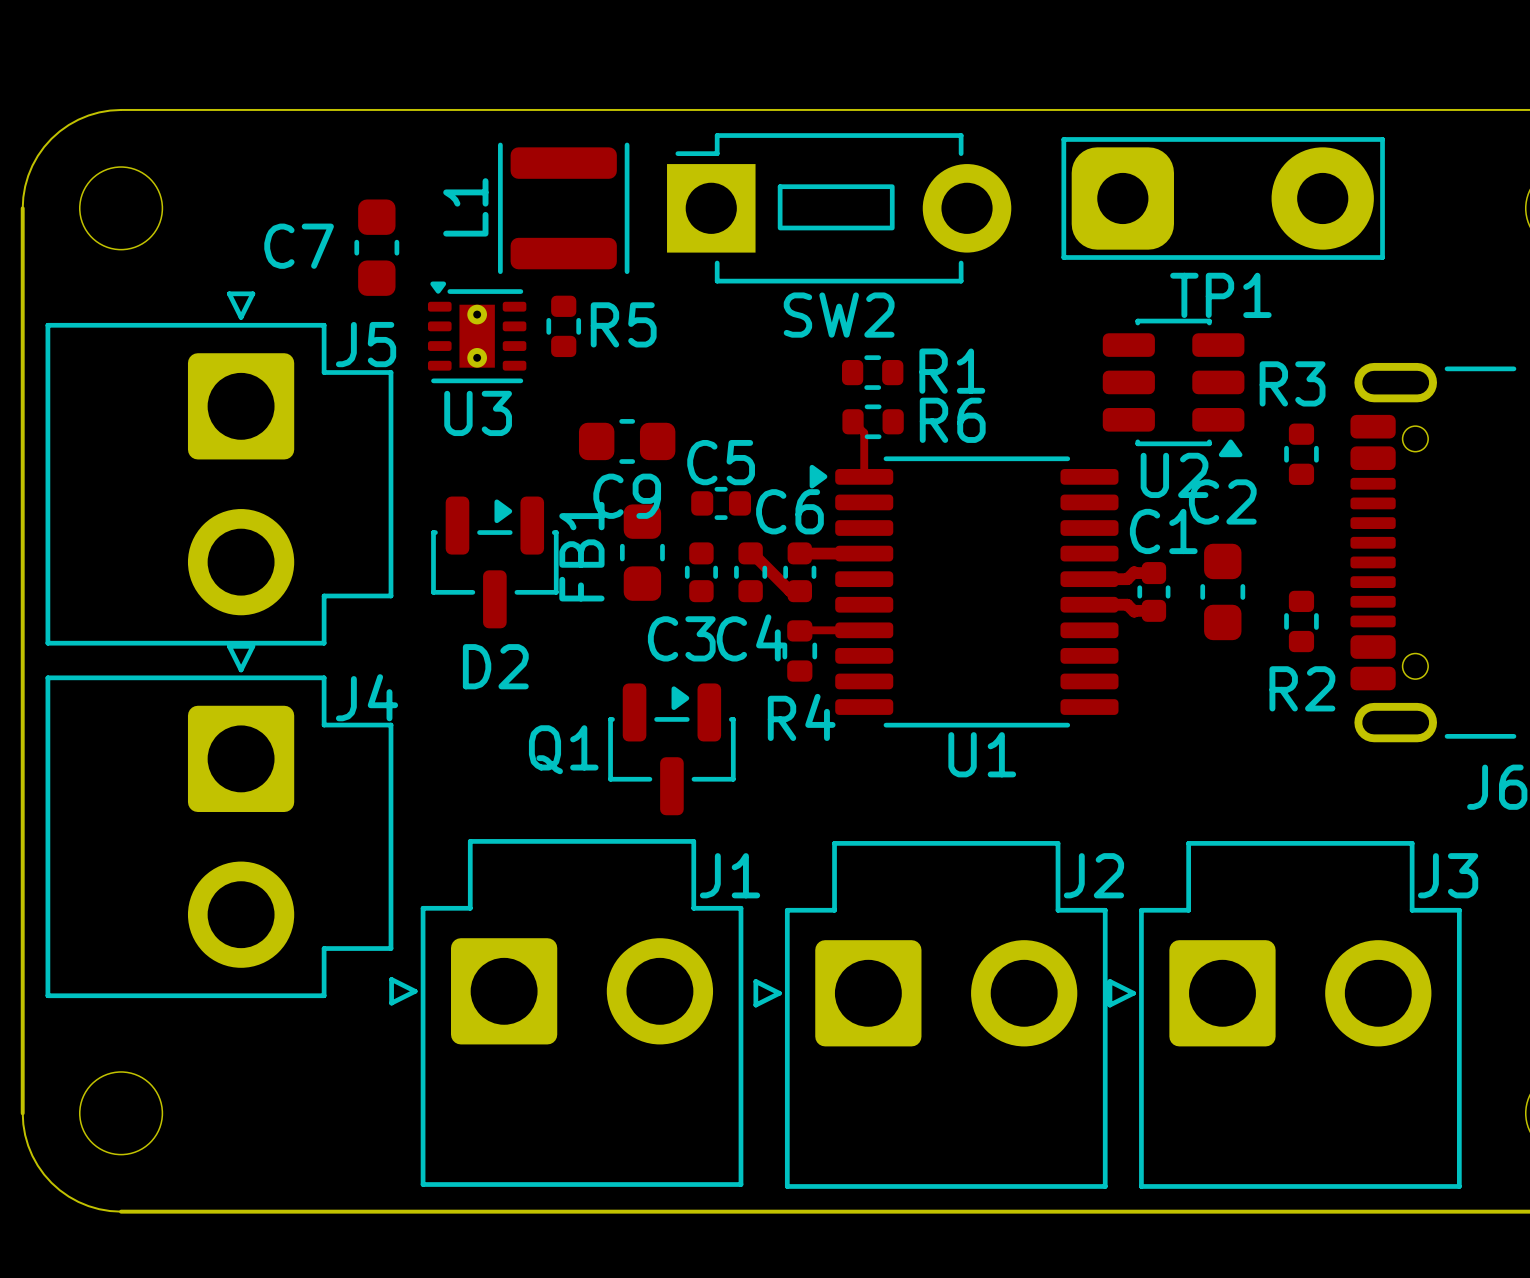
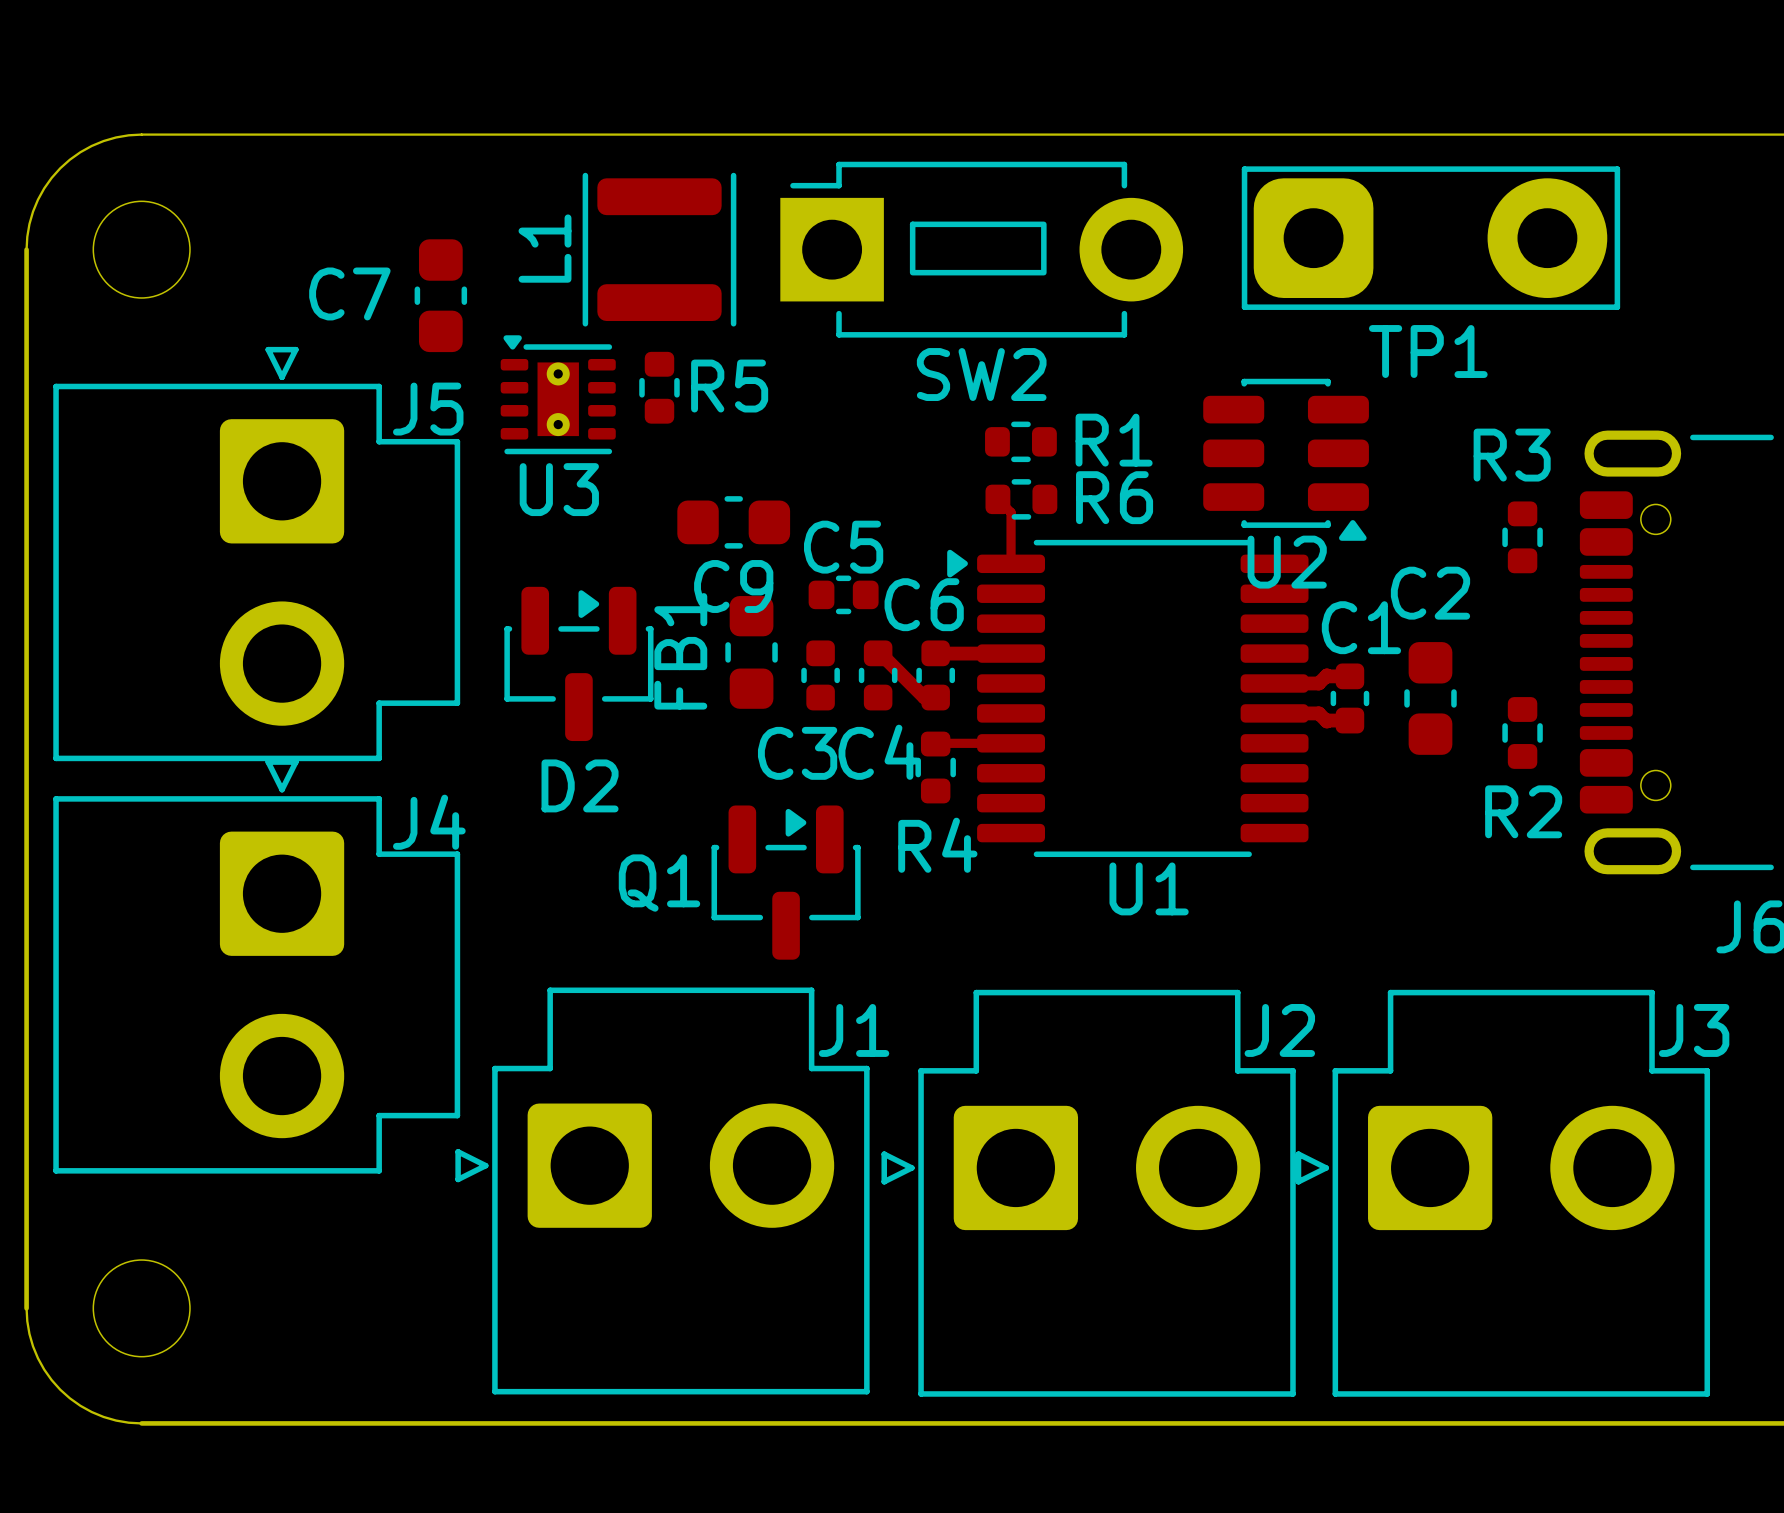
U2 position: (1173, 387) -> (1286, 459)

